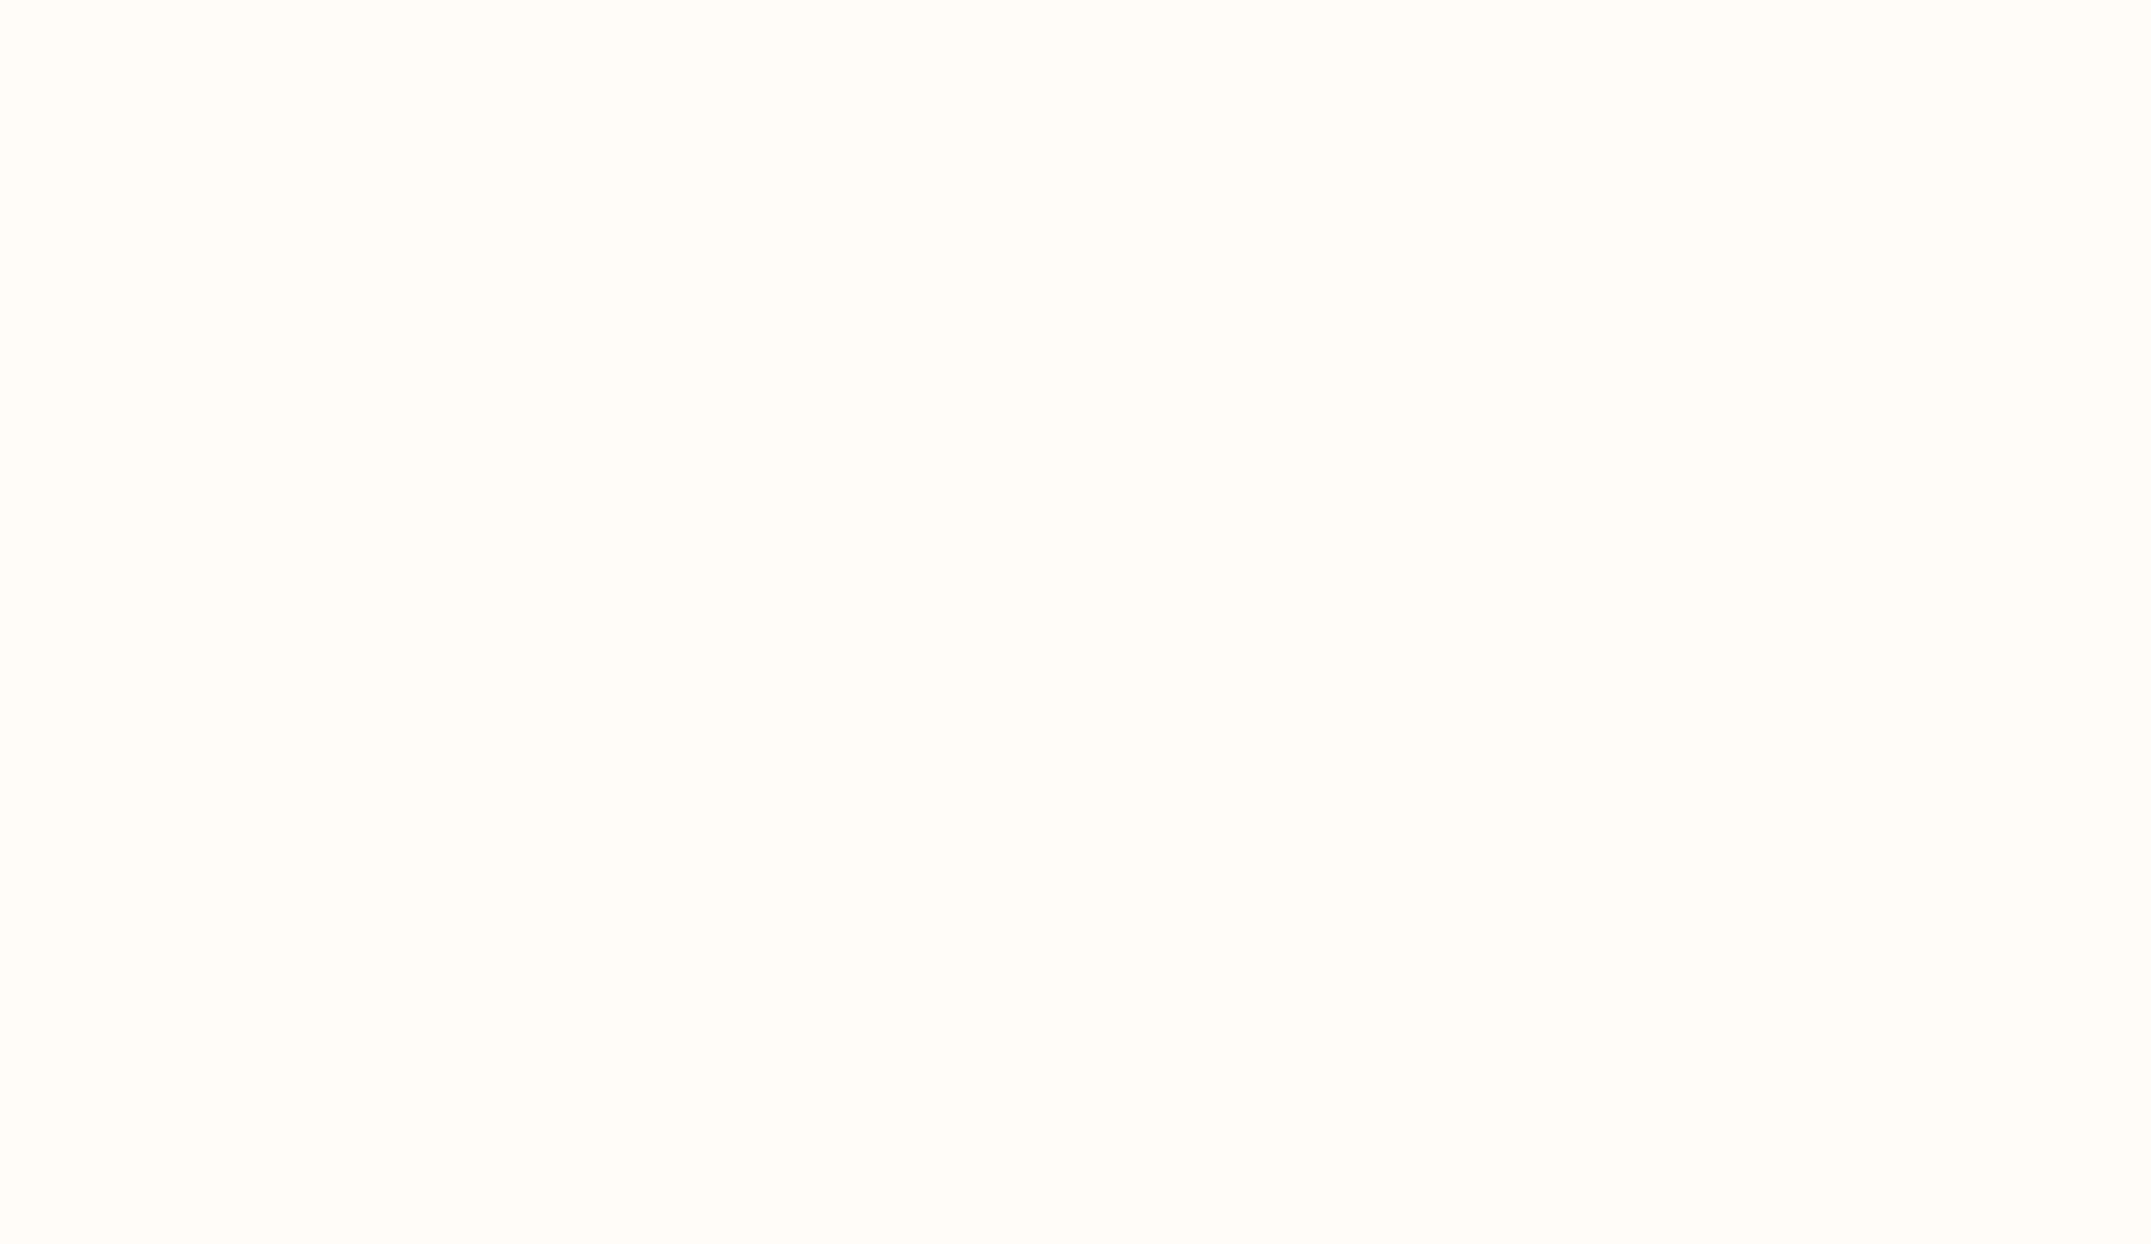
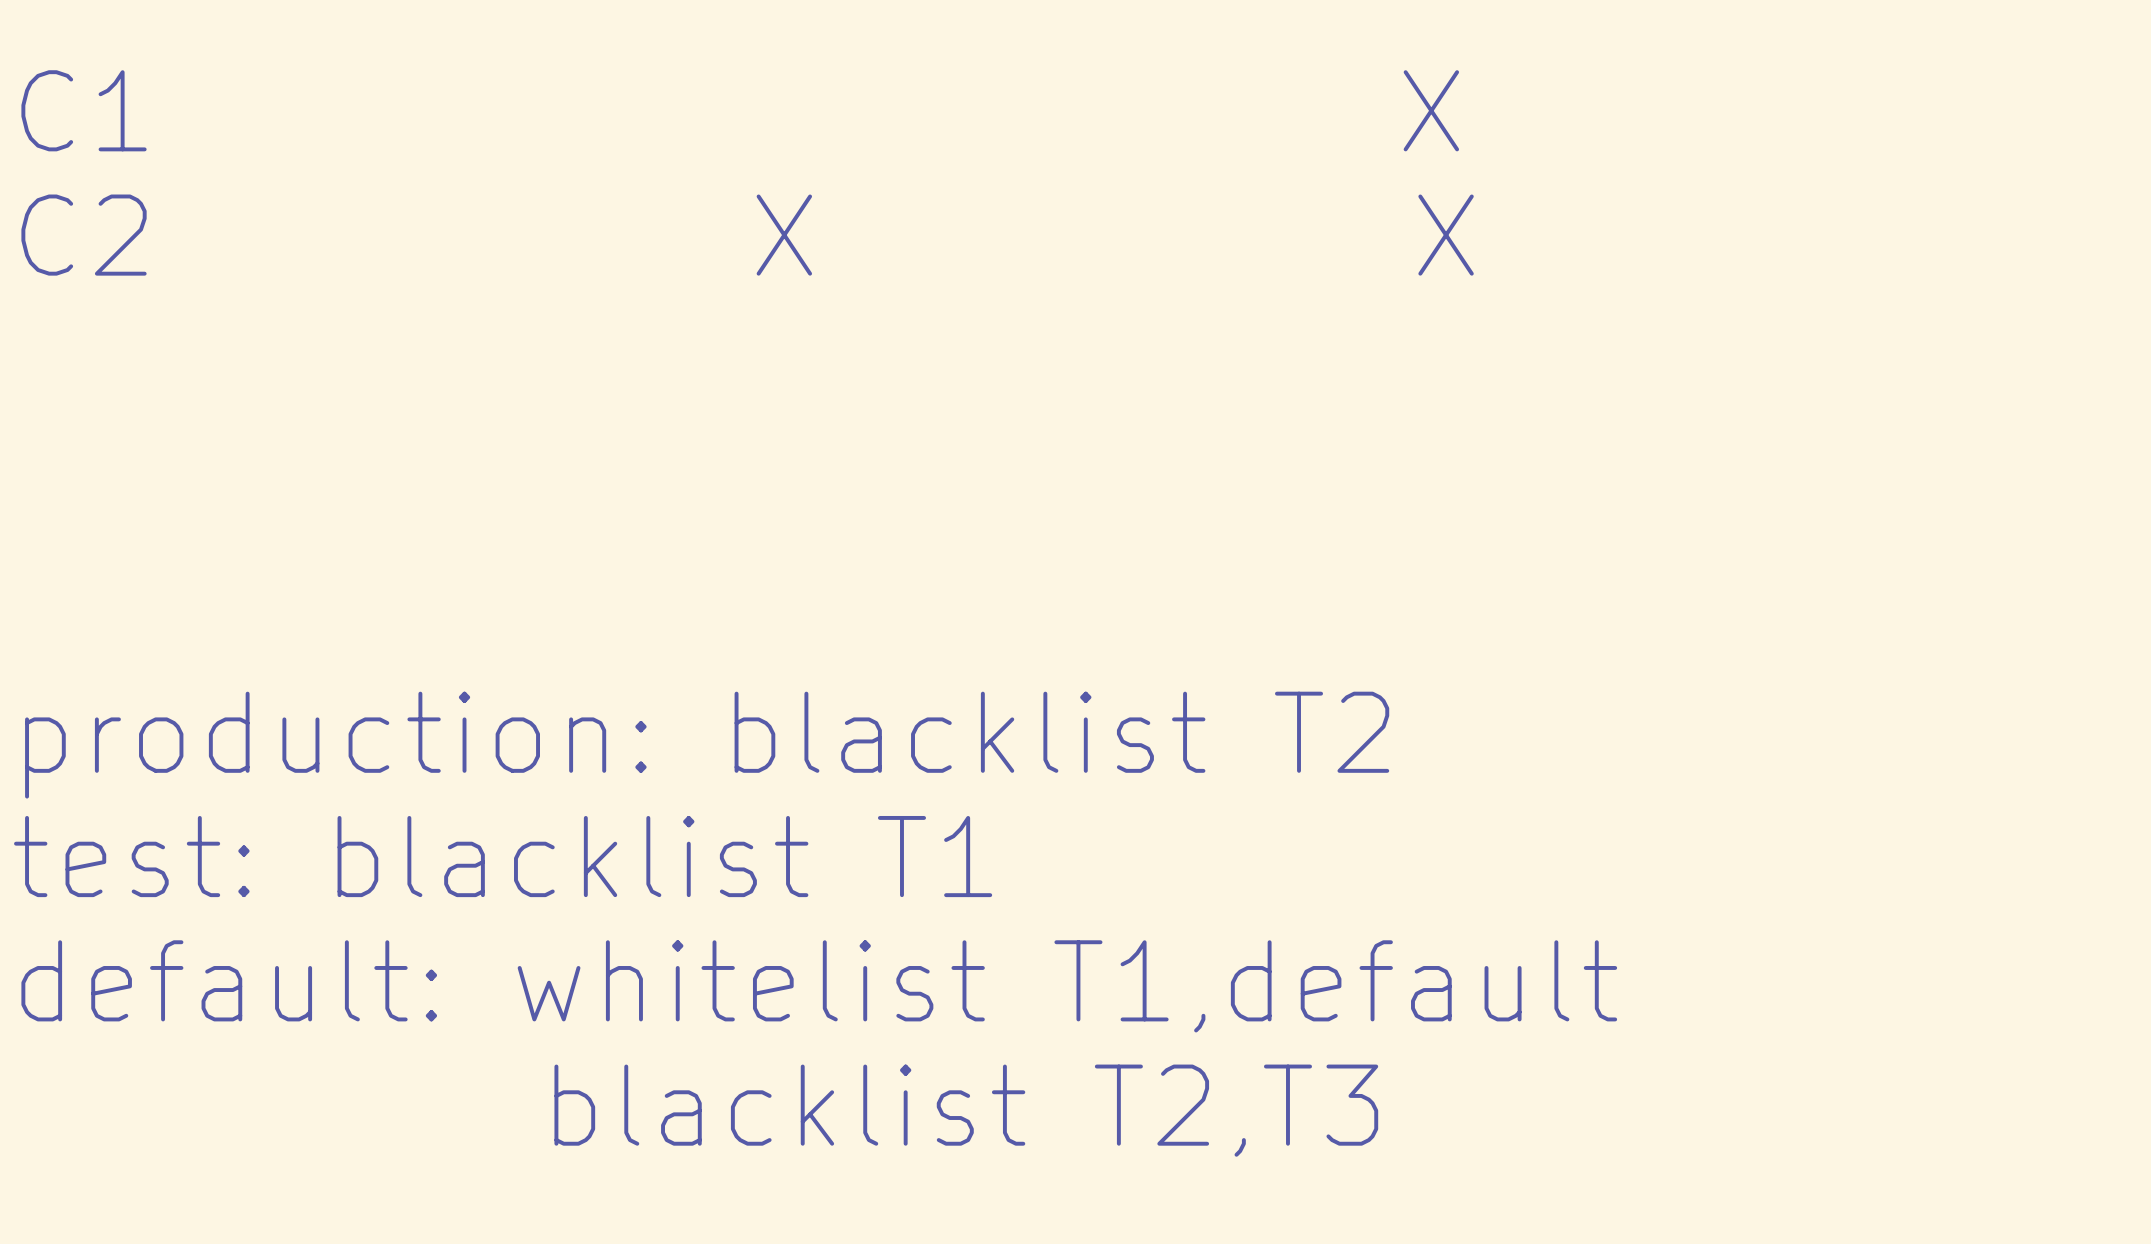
text: none -> C1 X (740, 110)
text: none -> C2 X X (747, 235)
text: none -> production: blacklist T2 (707, 745)
text: none -> test: blacklist T1 (503, 856)
text: none -> default: whitelist T1,default (819, 986)
text: none -> blacklist T2,T3 (966, 1110)

